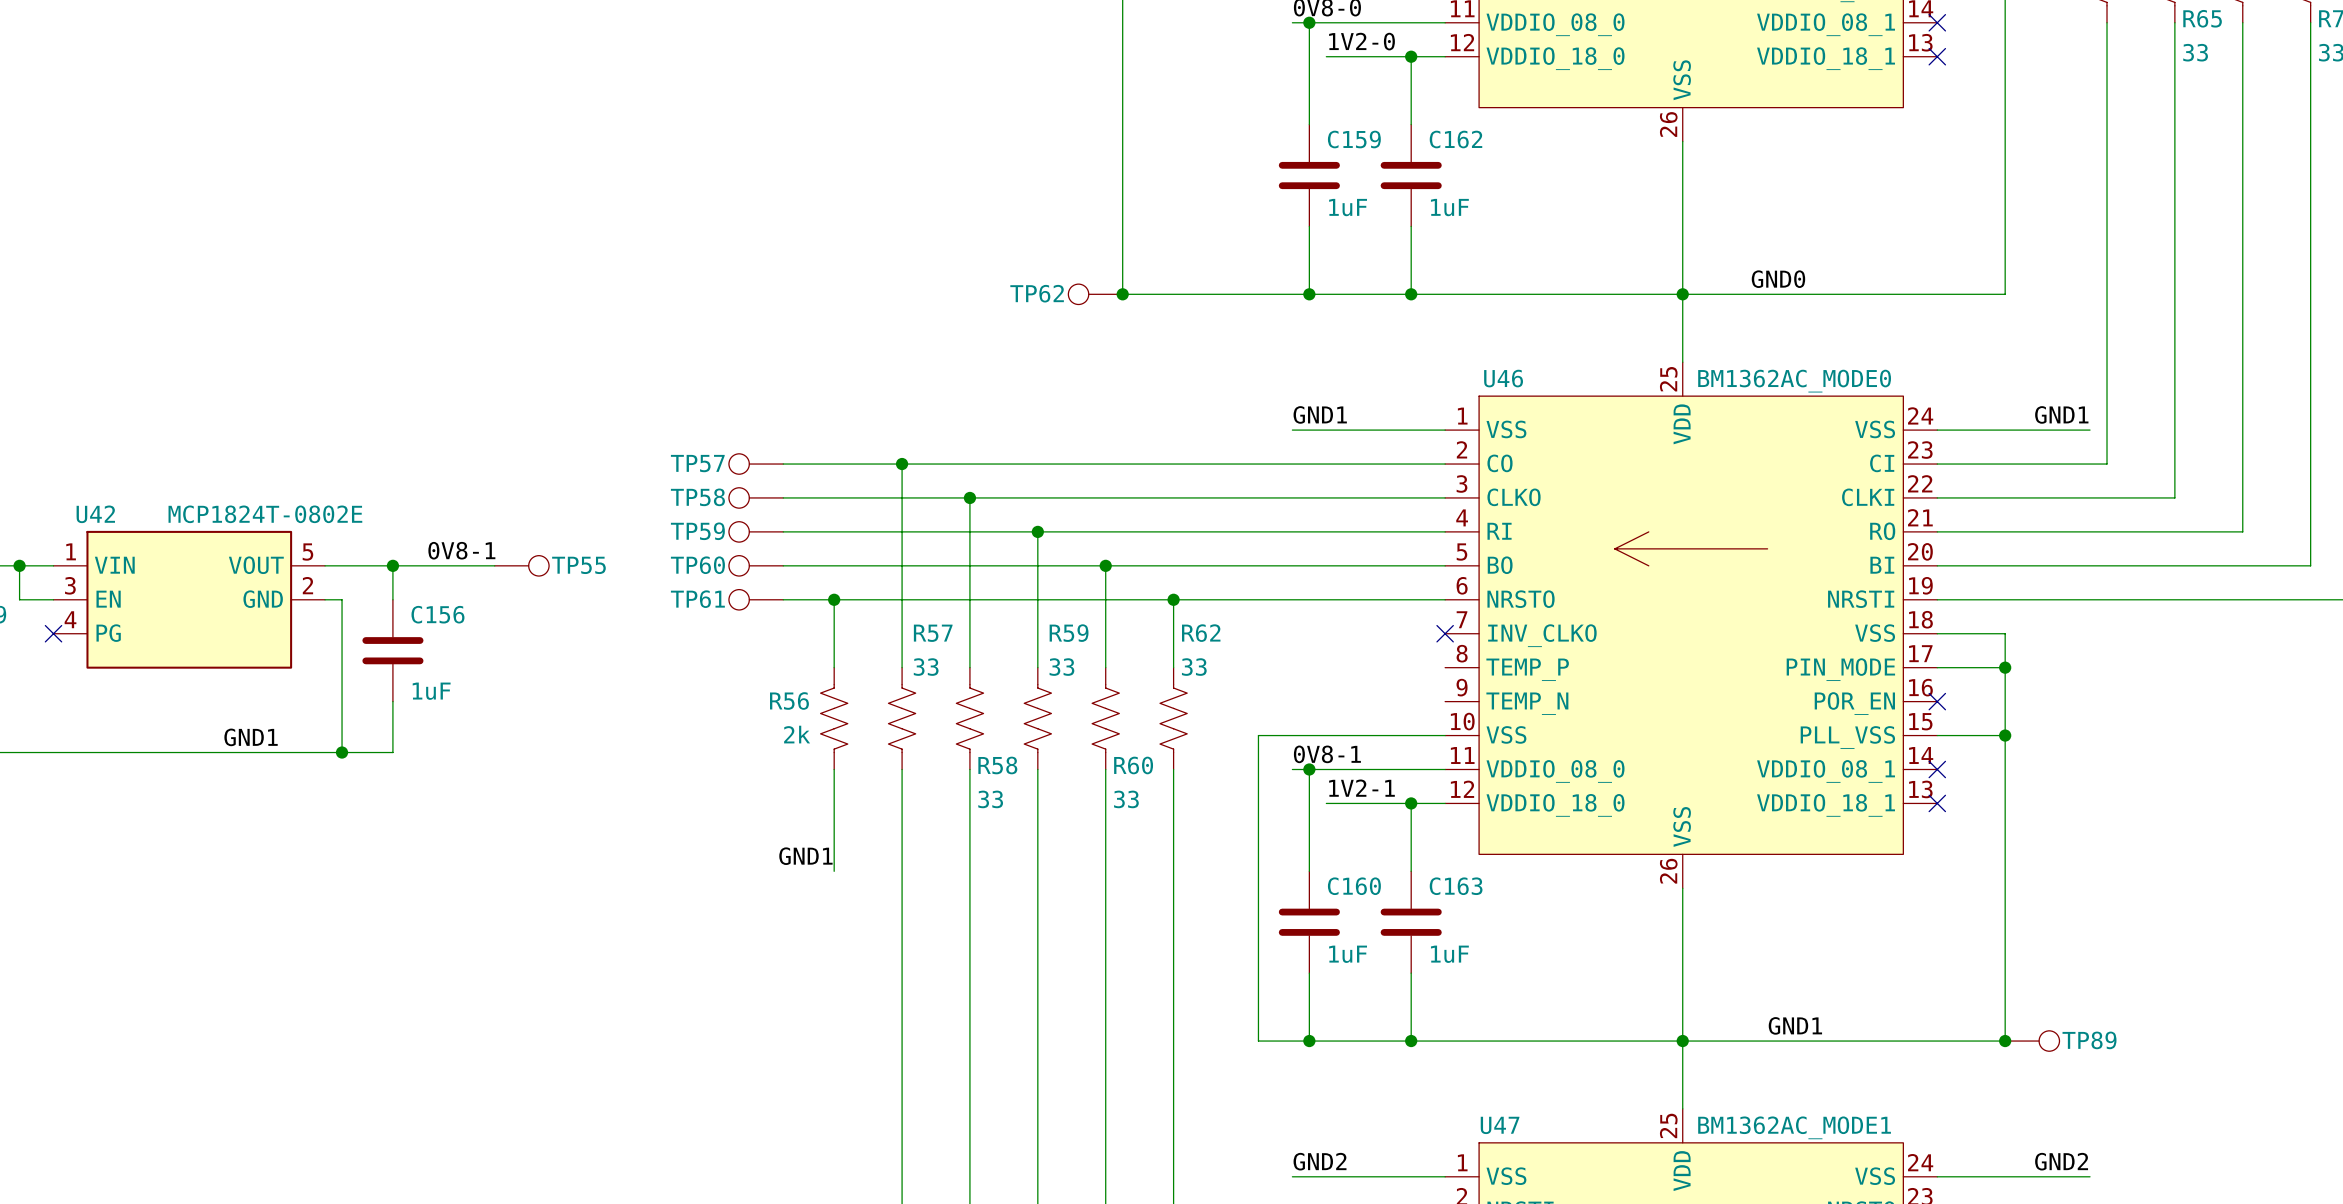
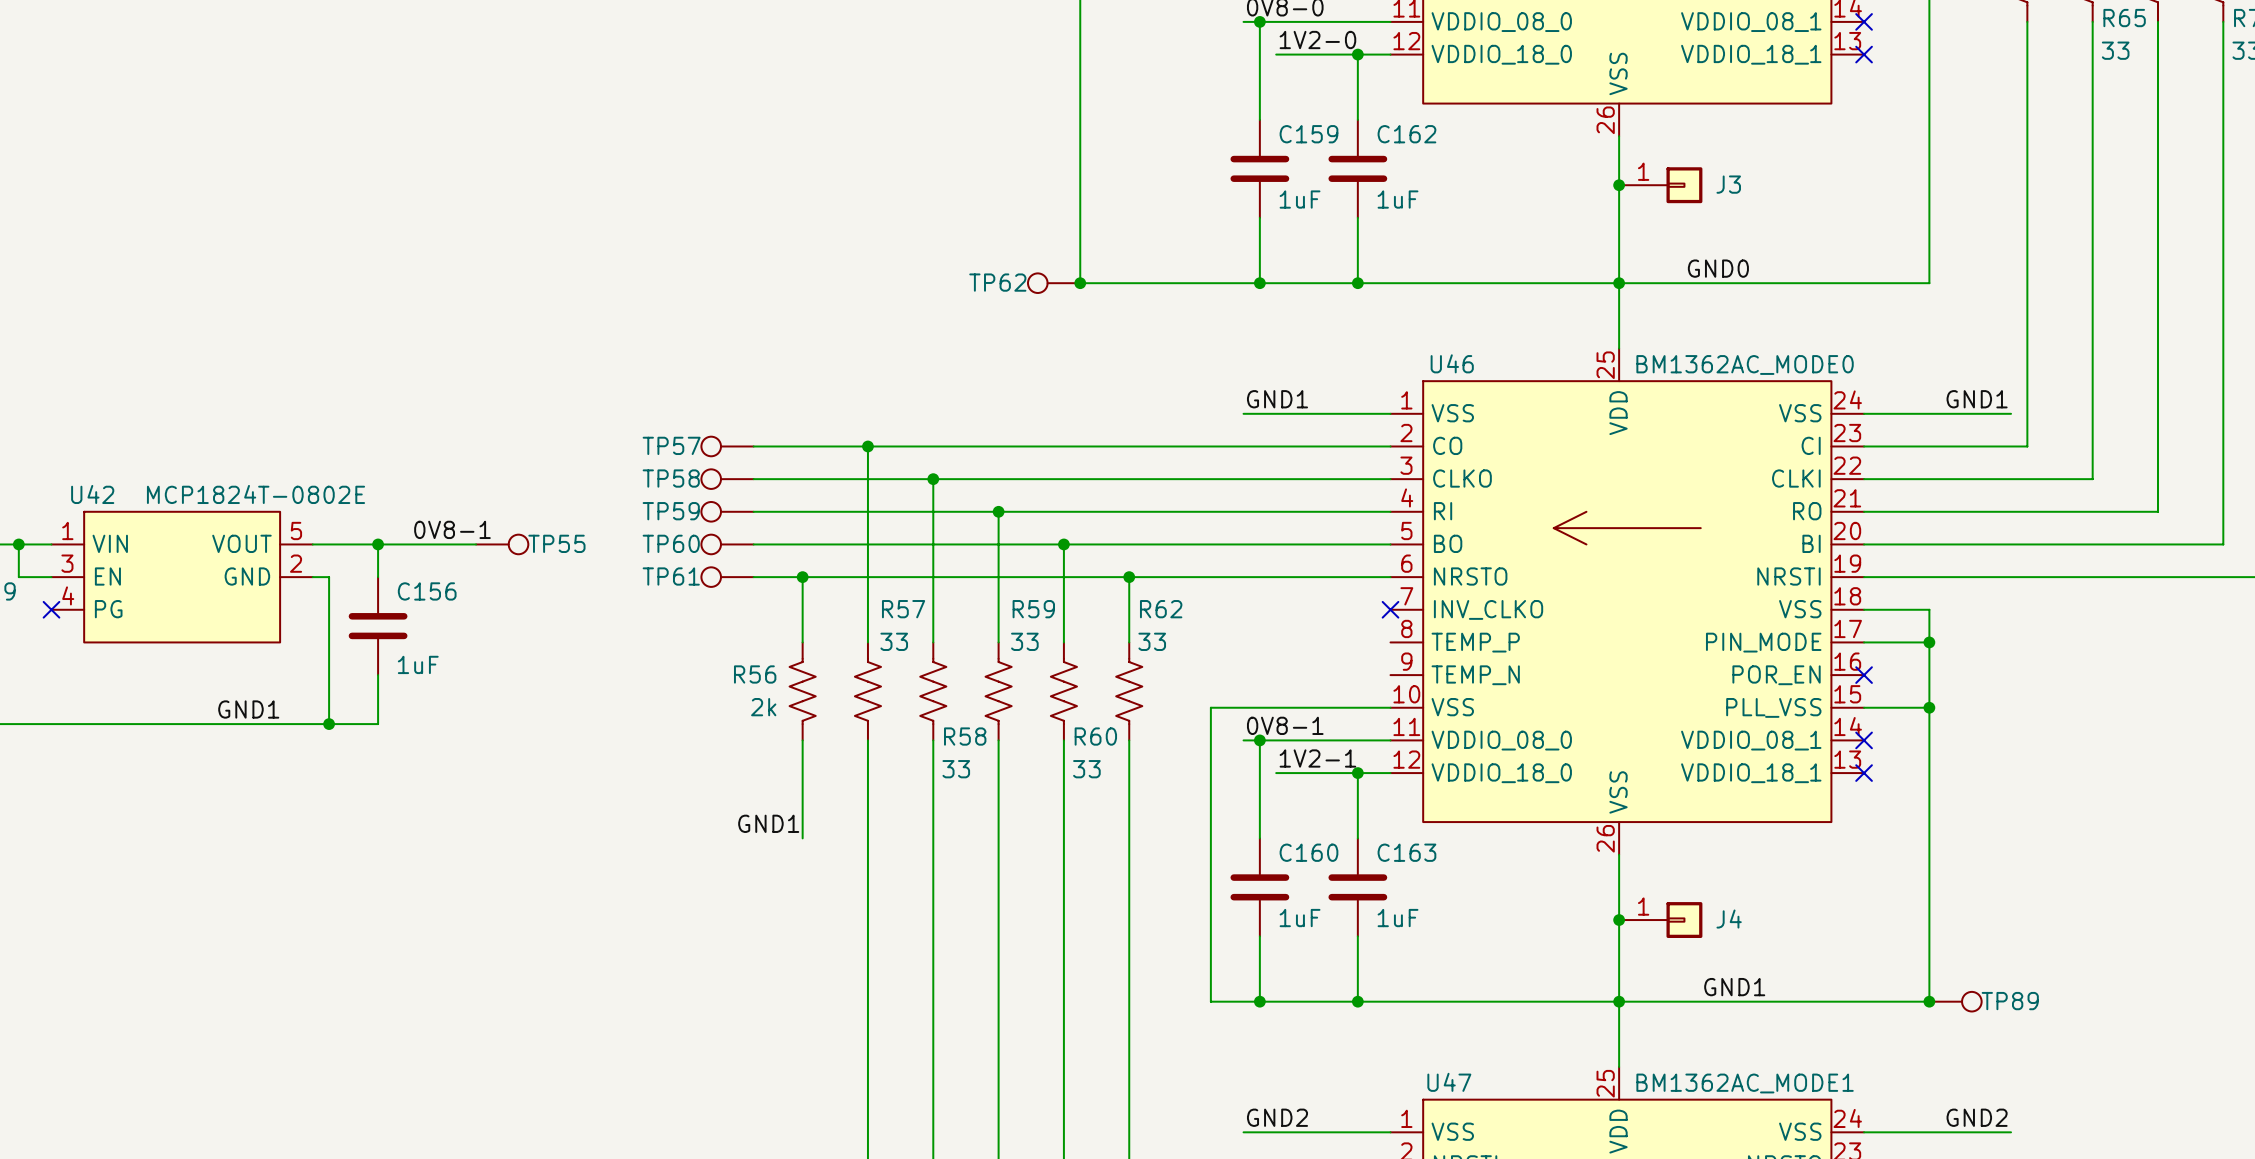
junction: none -> (1619, 185)
J3: none -> (1660, 185)
junction: none -> (1619, 920)
J4: none -> (1660, 920)

